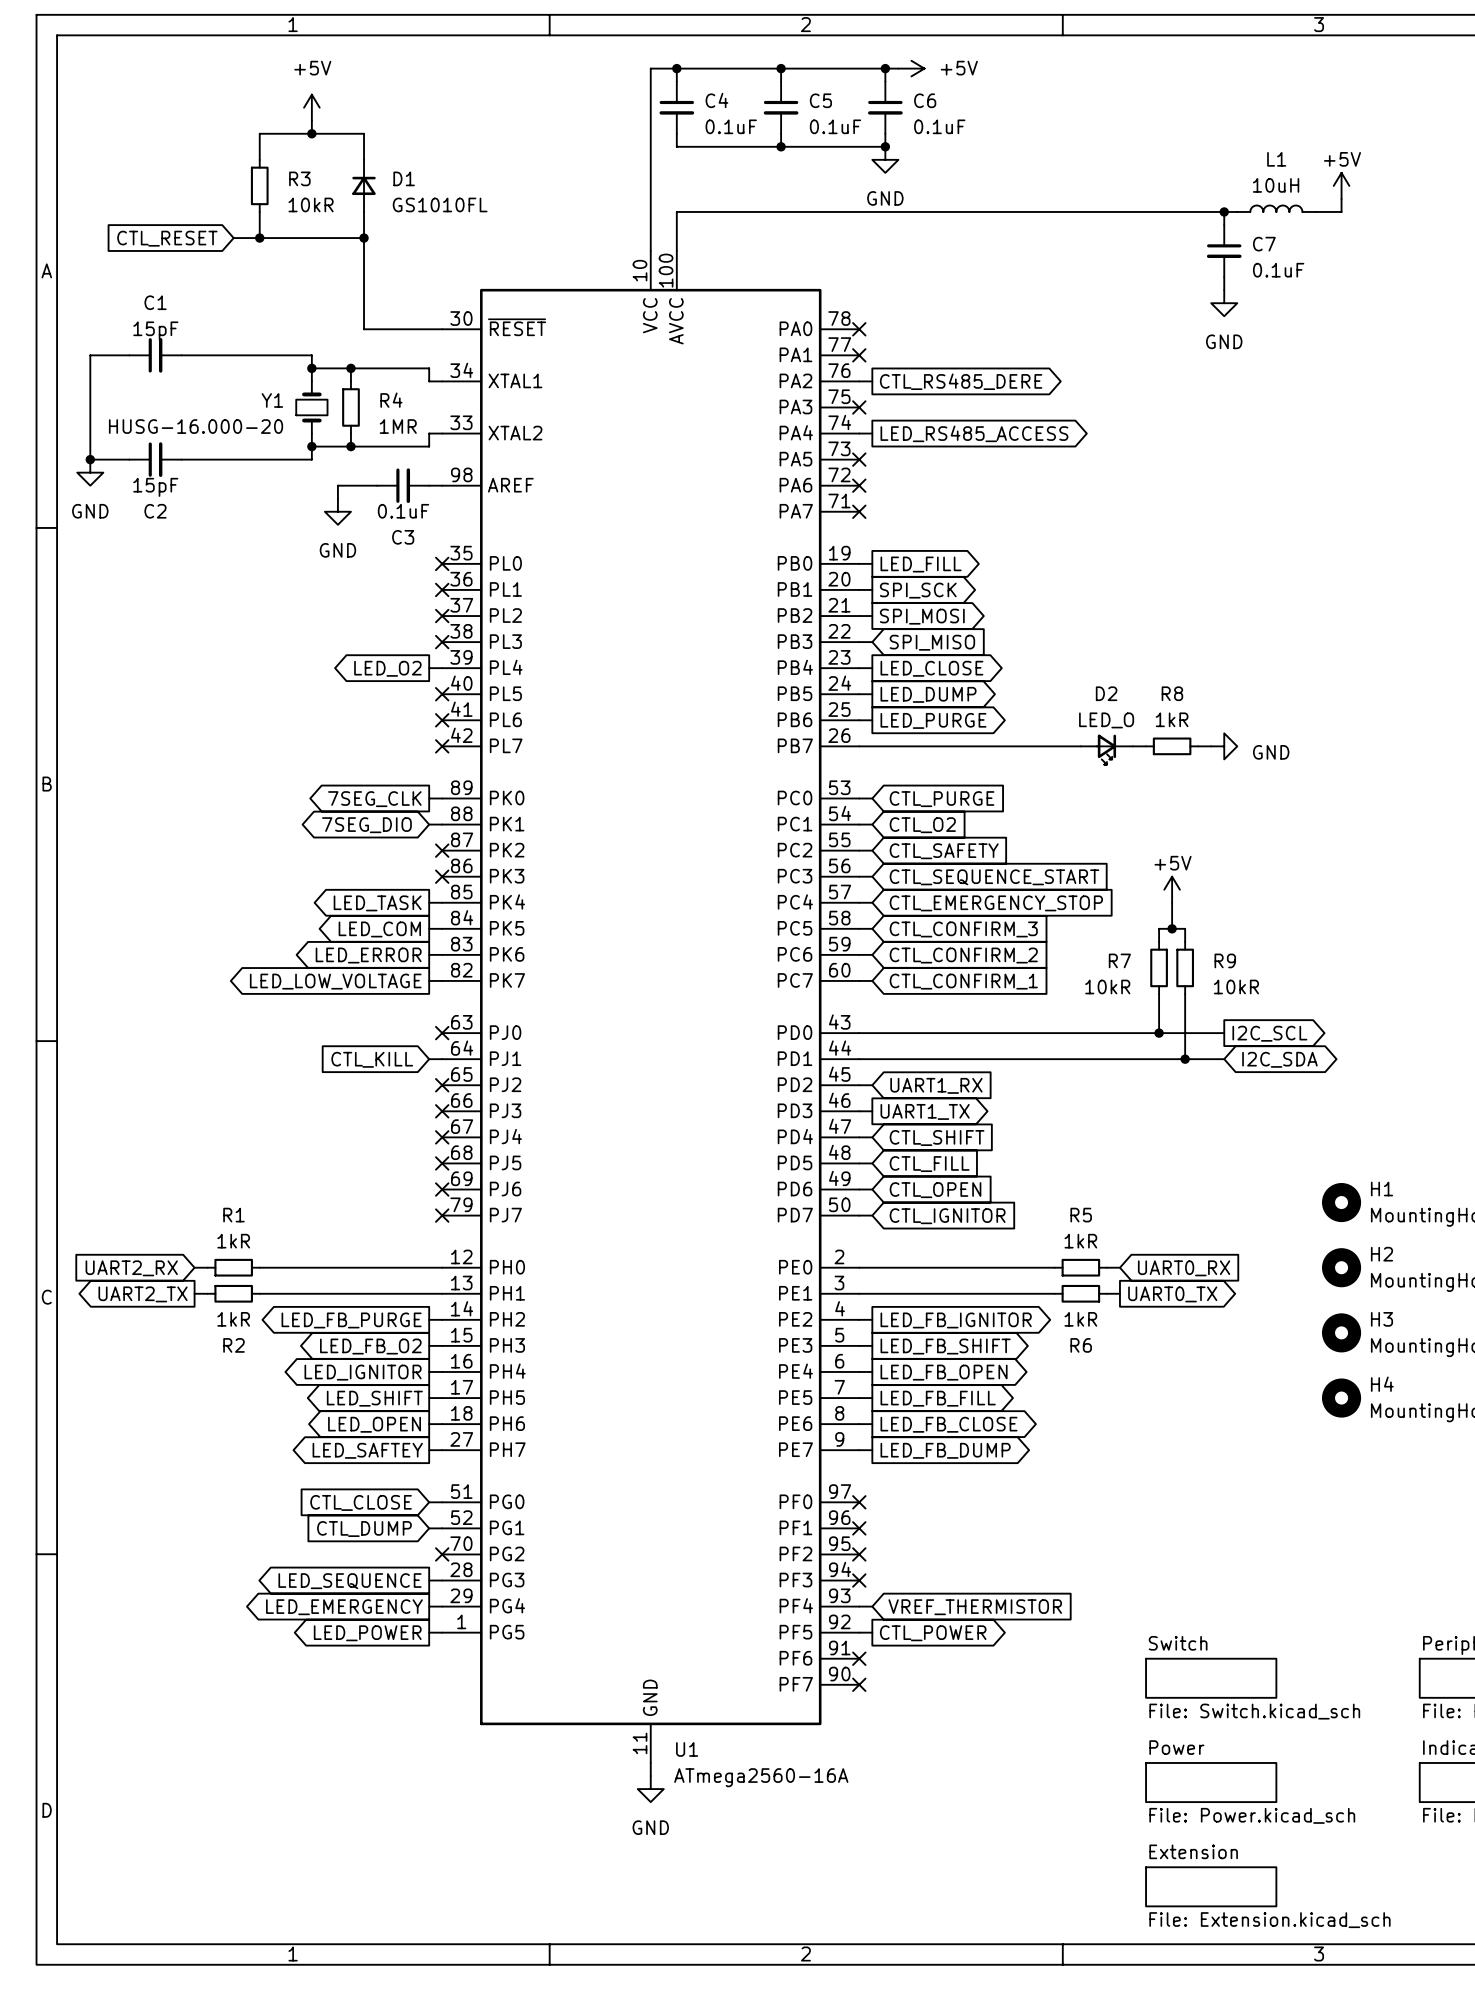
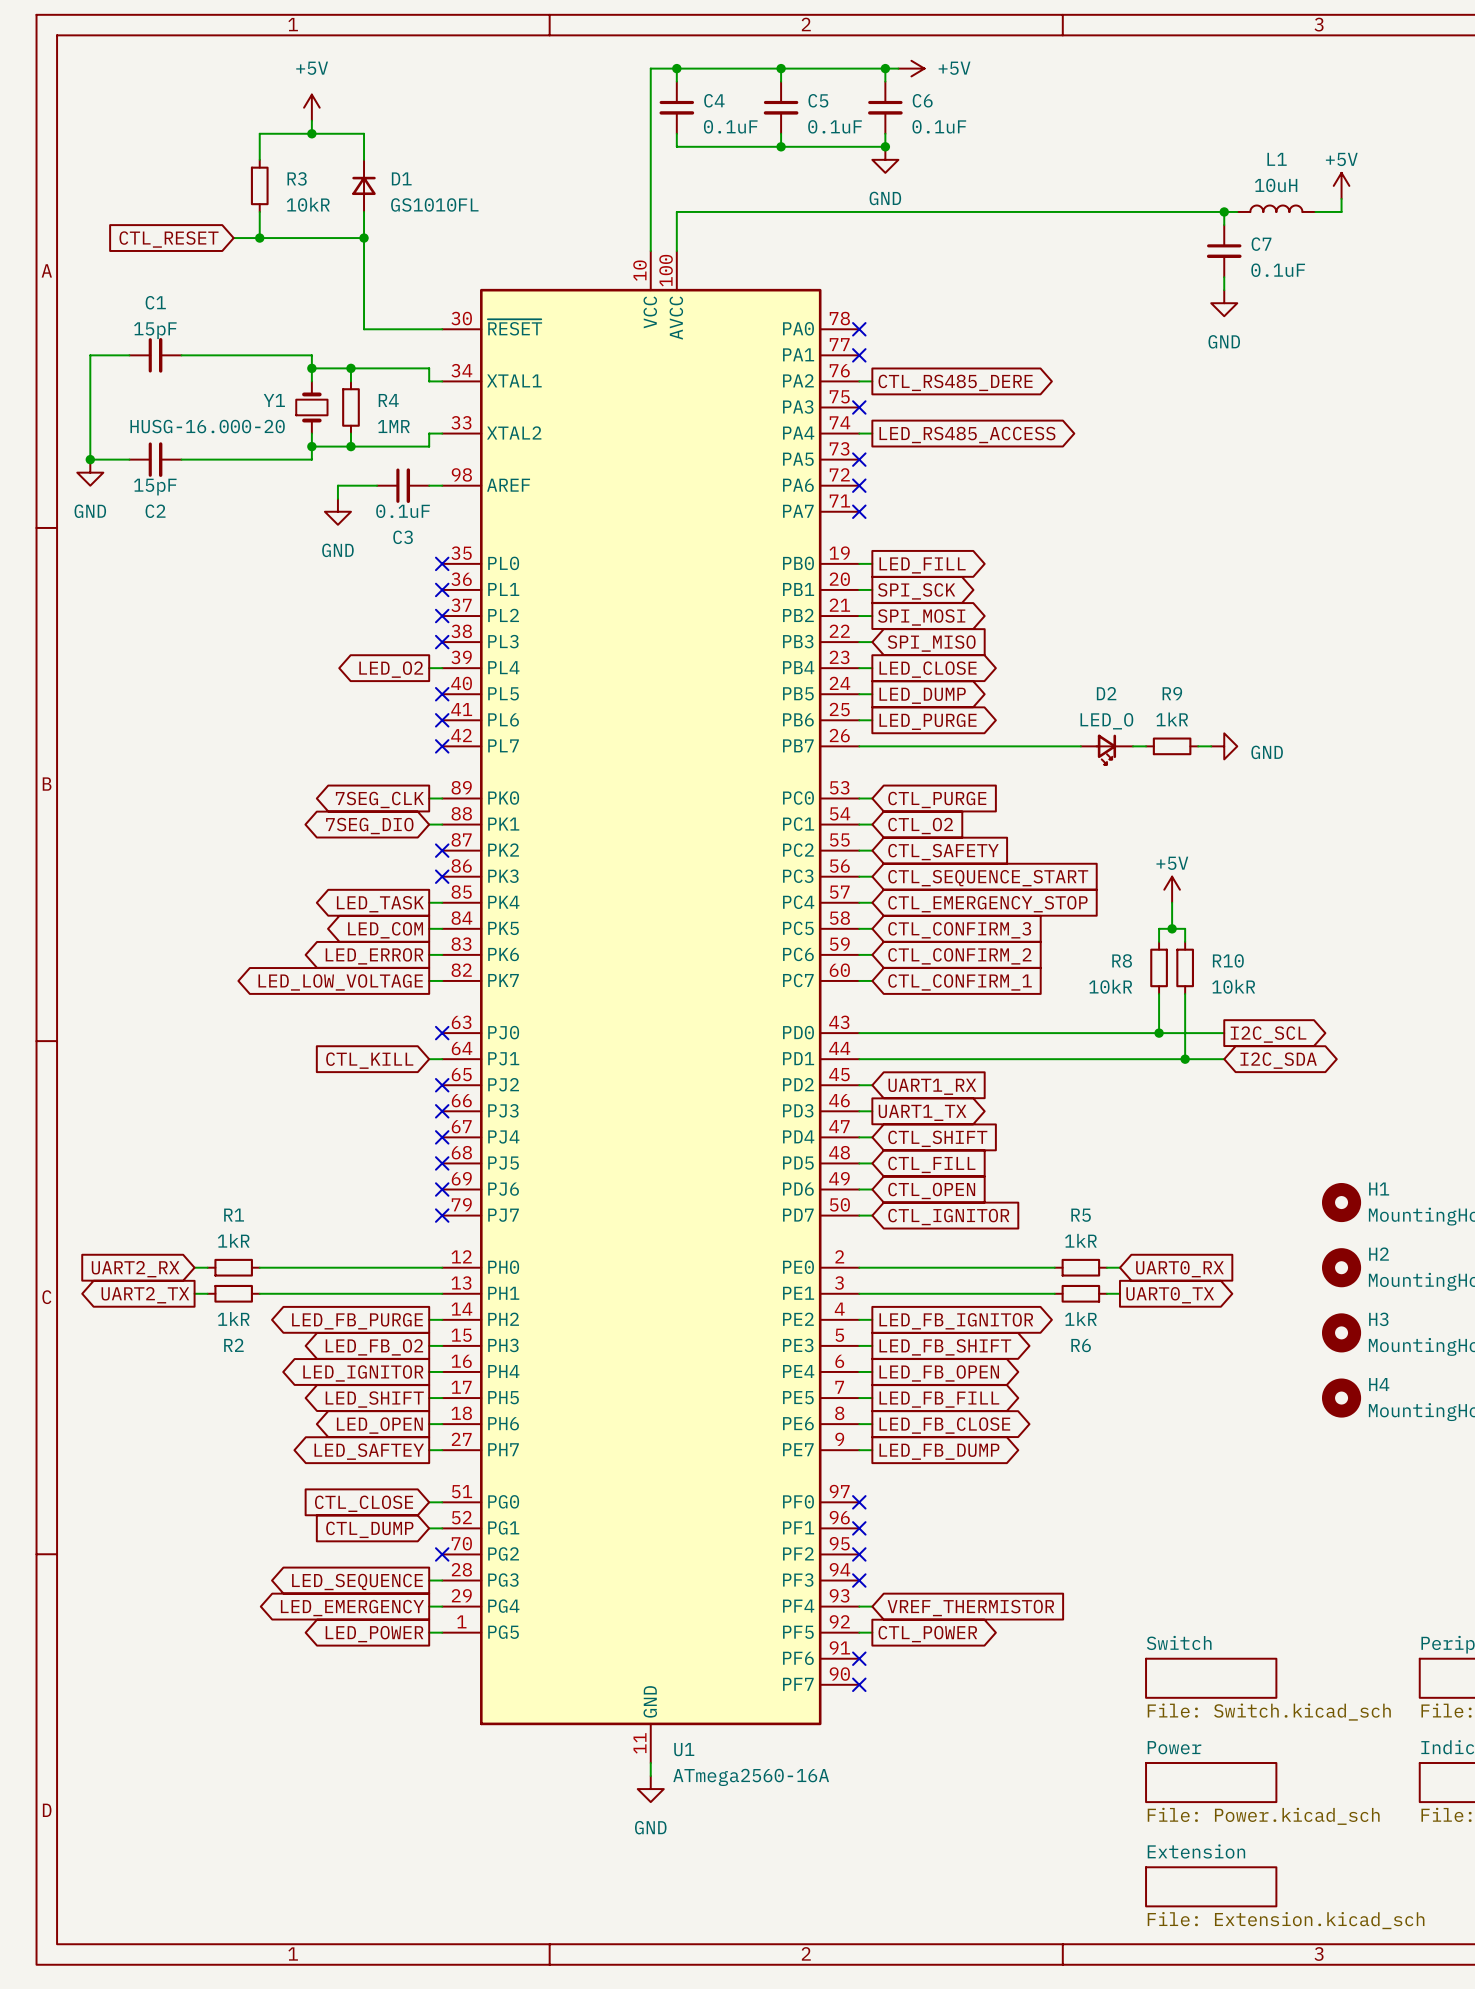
R8 name: R8 (1172, 693) -> R9 (1172, 693)
R7 name: R7 (1119, 960) -> R8 (1122, 960)
R9 name: R9 (1225, 960) -> R10 (1228, 960)

